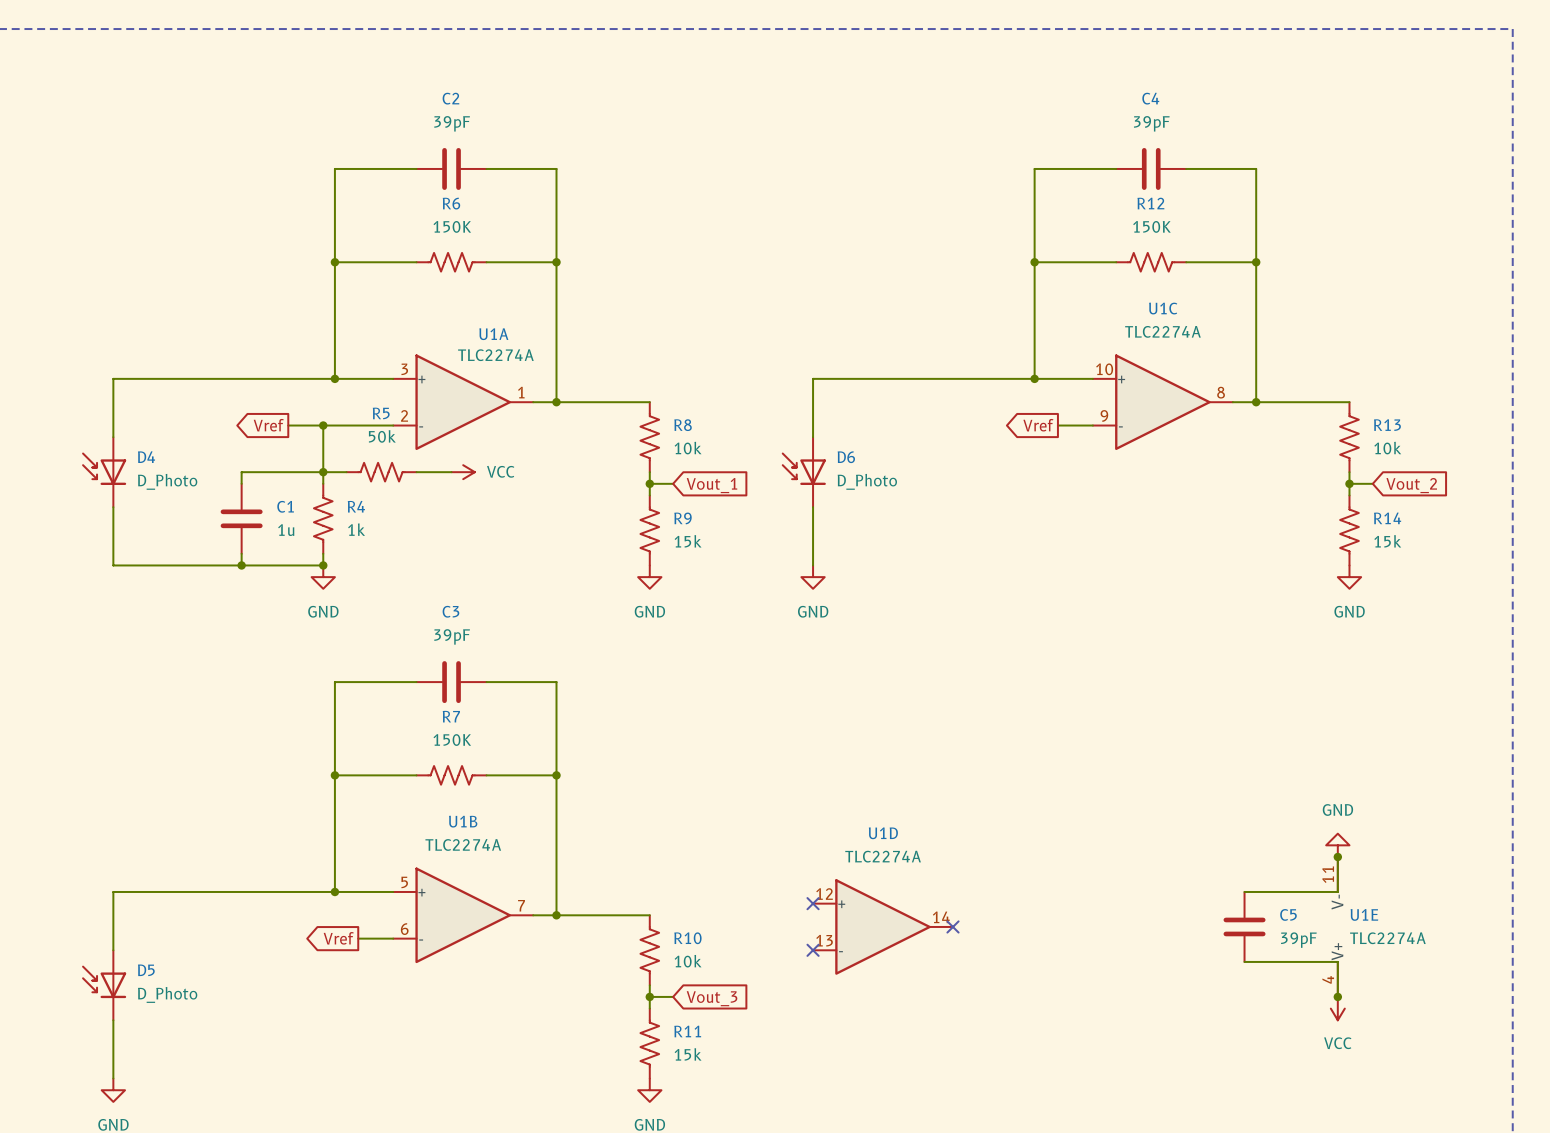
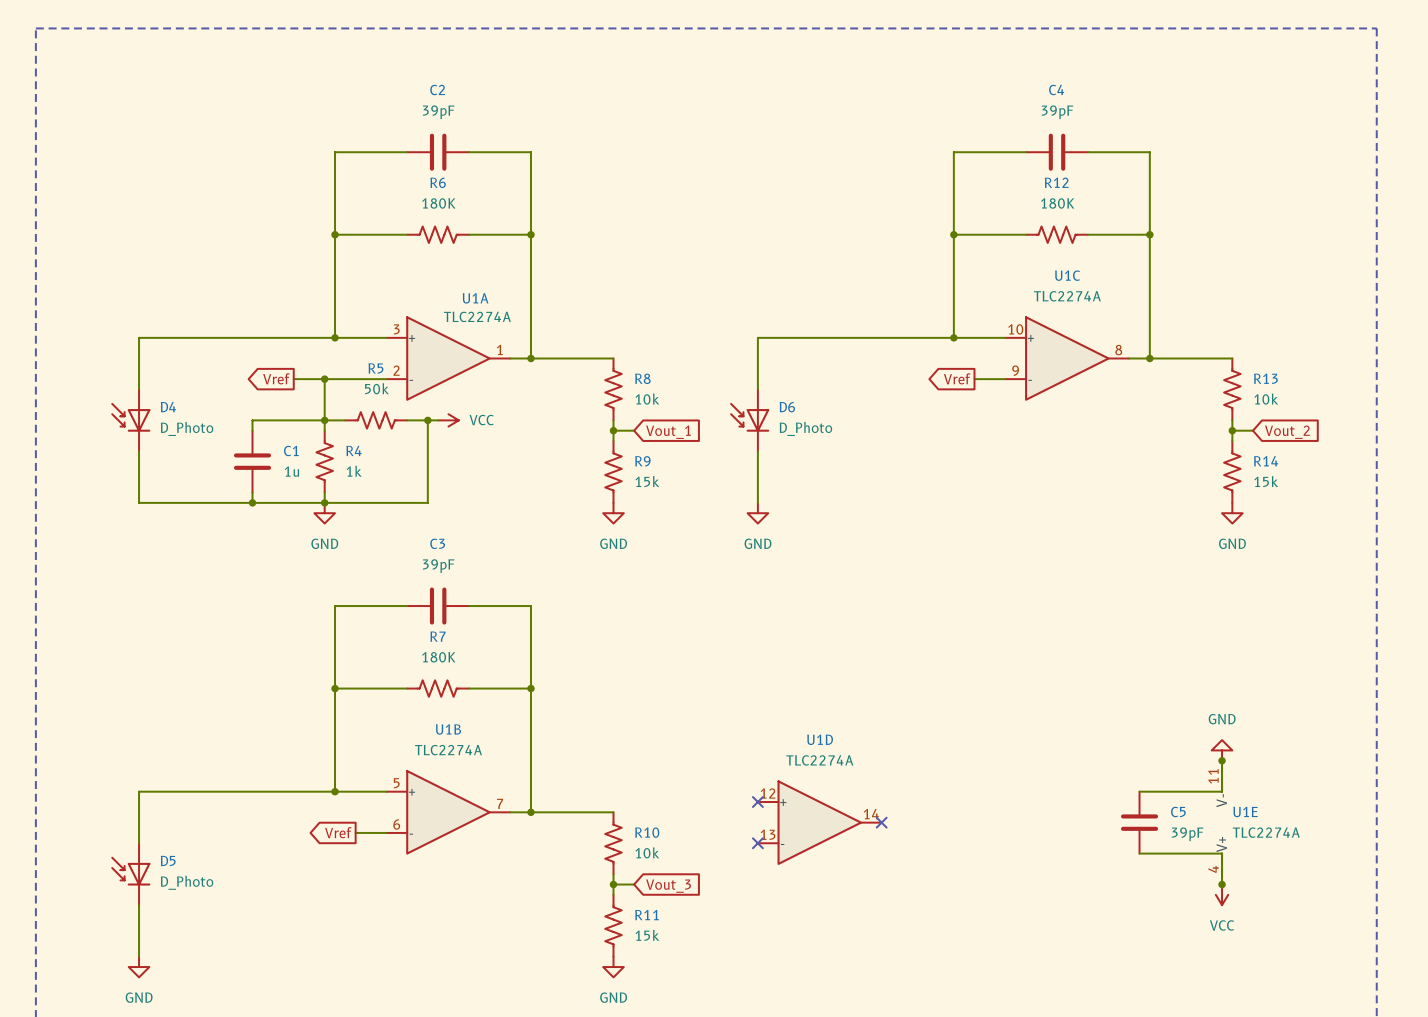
R6 value: 150K (452, 226) -> 180K (438, 203)
R12 value: 150K (1151, 226) -> 180K (1057, 203)
wire: none -> (427, 420) (427, 502) (324, 502)
junction: none -> (427, 420)
R7 value: 150K (452, 740) -> 180K (438, 657)

